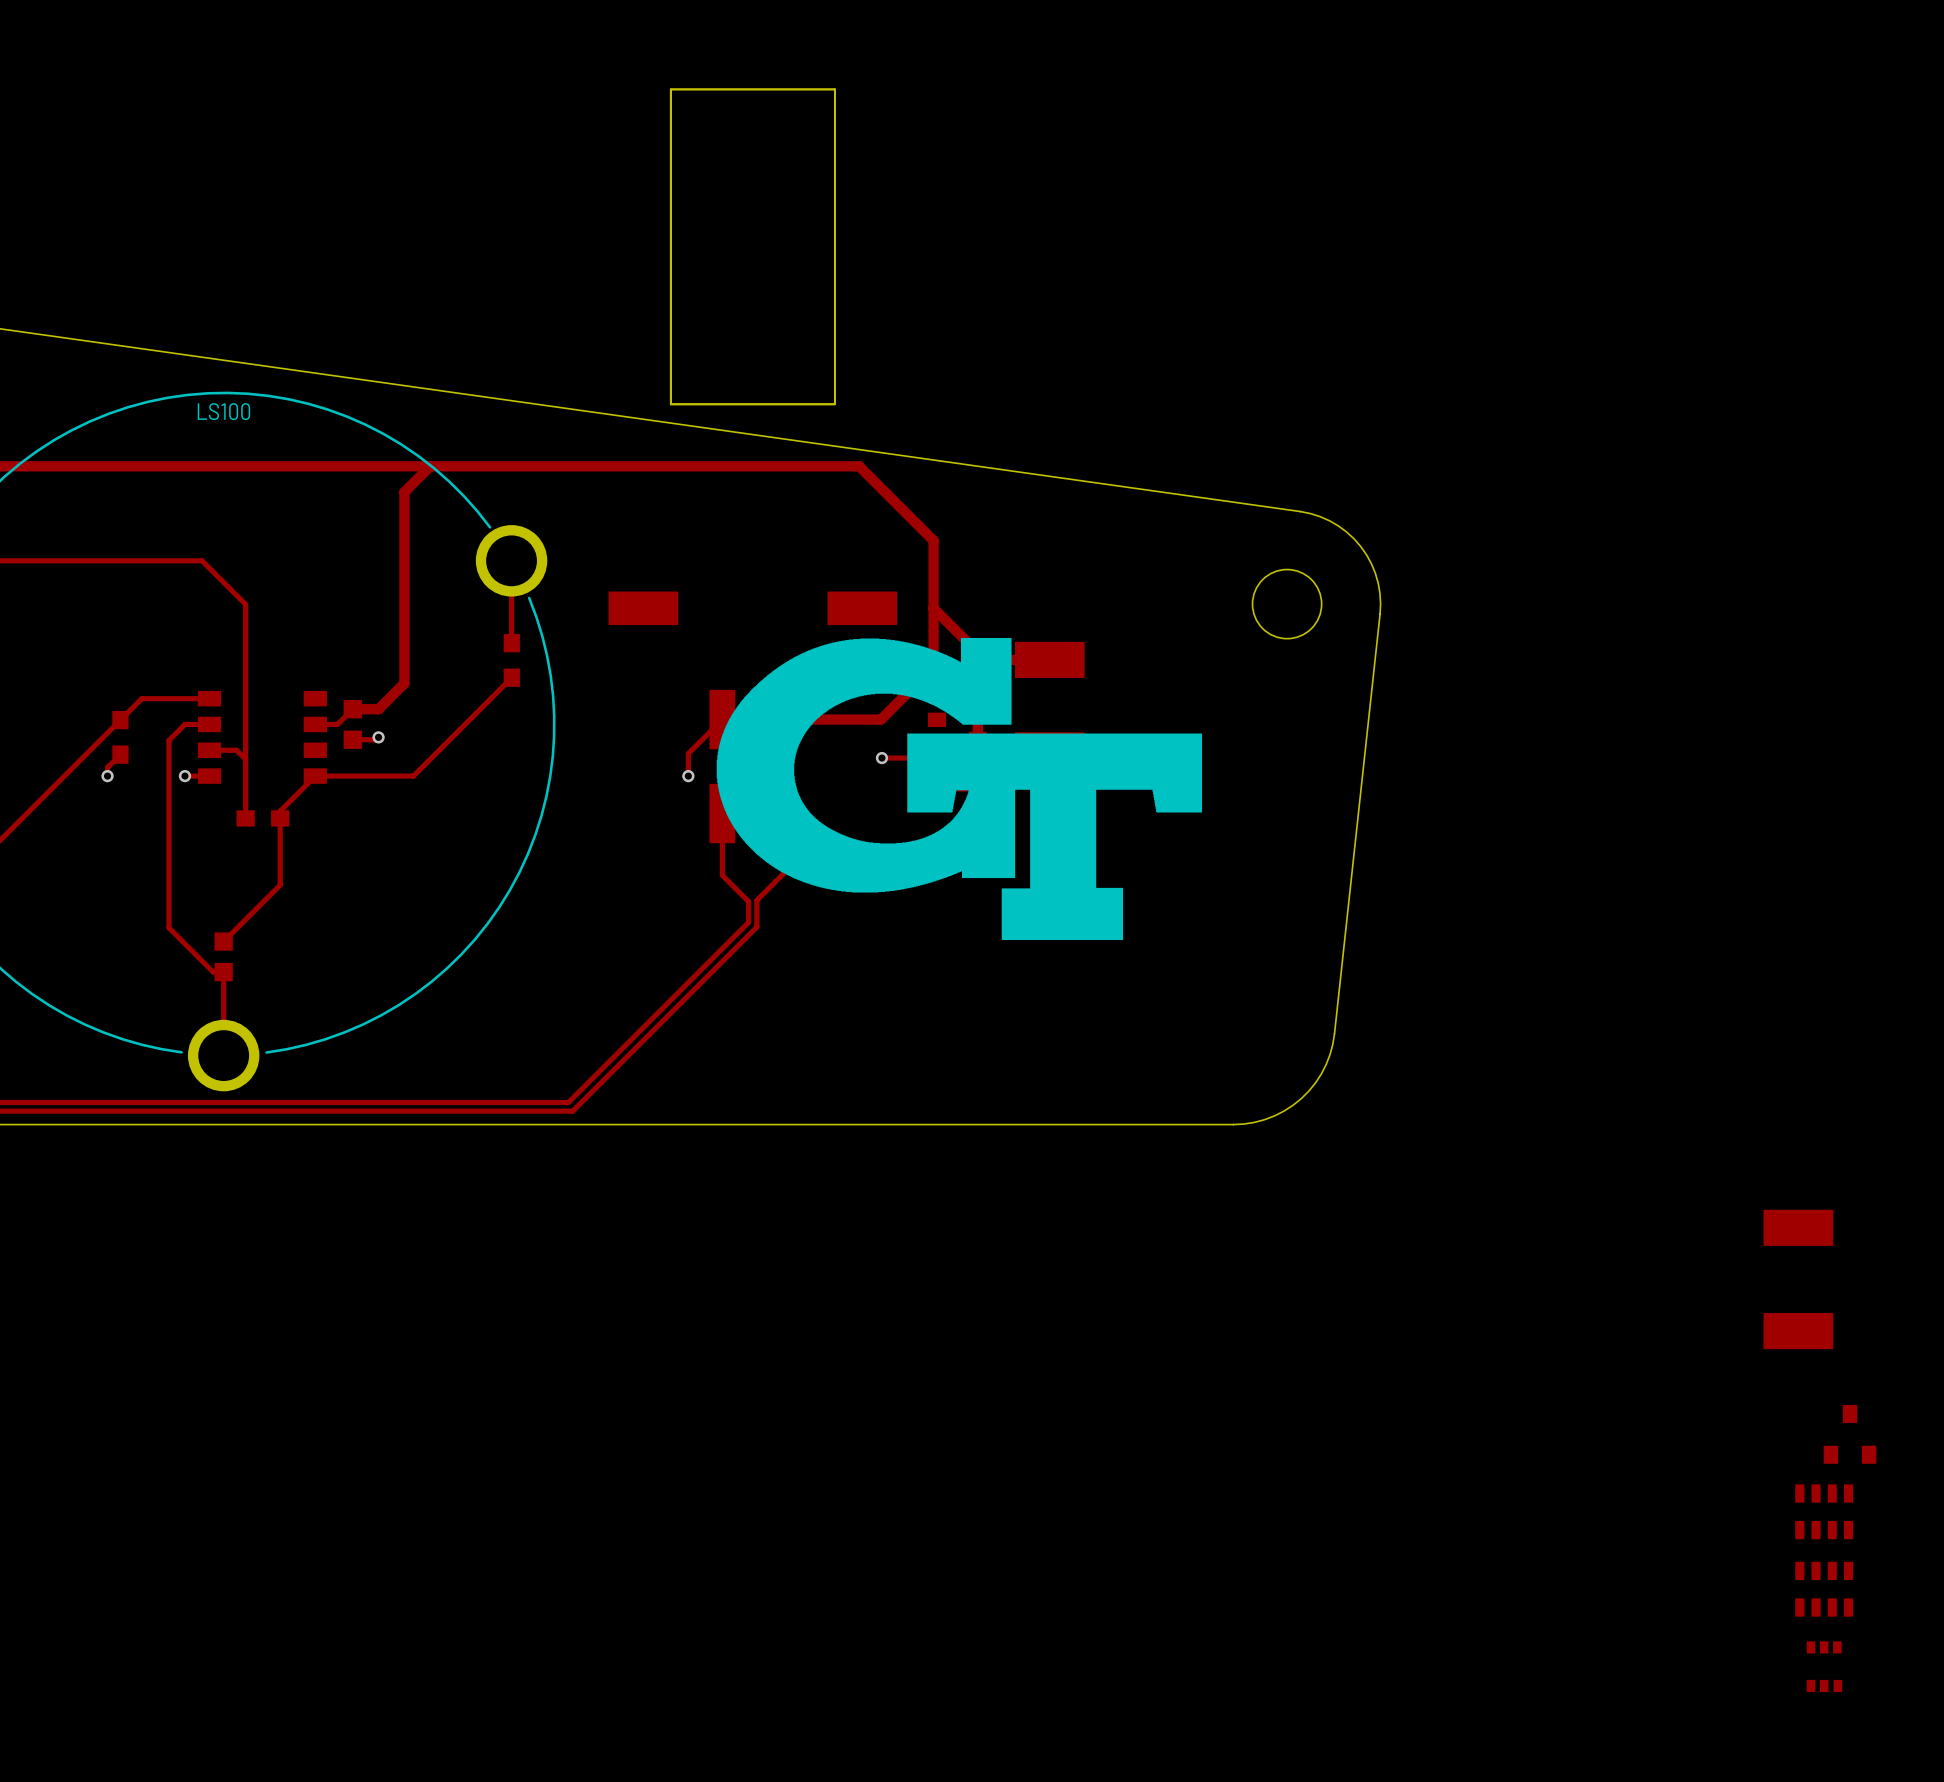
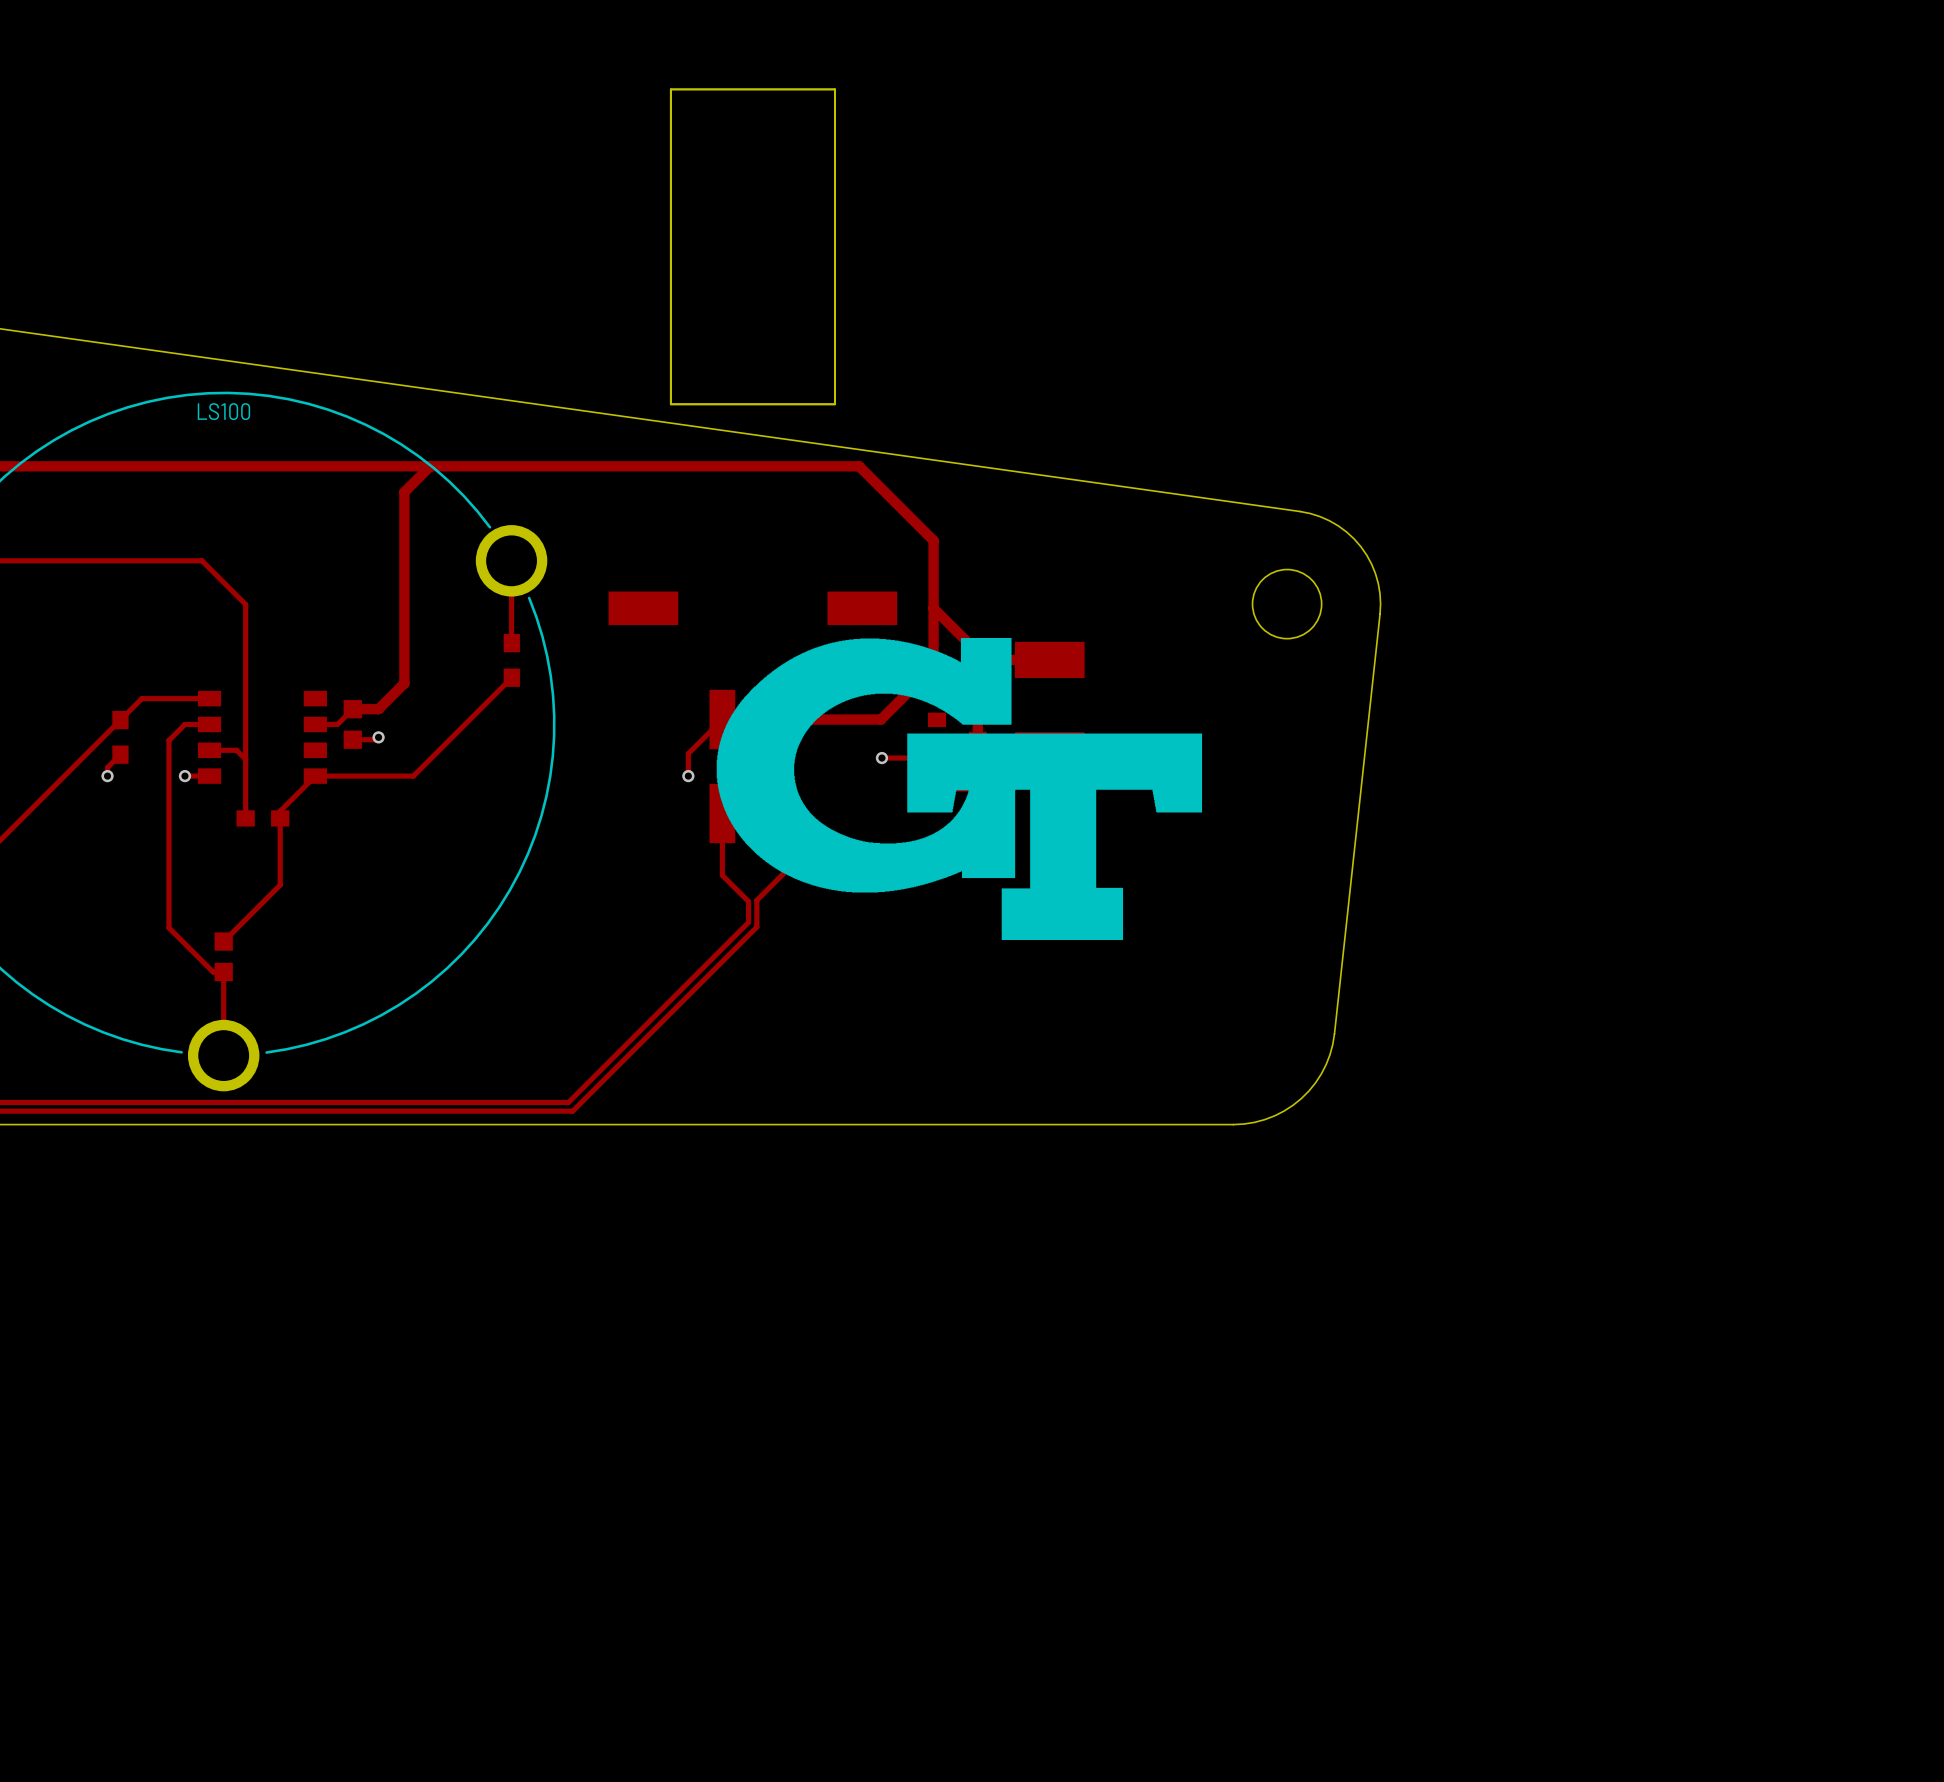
part: (1798, 1227) -> none
part: (1798, 1331) -> none
part: (1849, 1434) -> none
part: (1824, 1511) -> none
part: (1824, 1589) -> none
part: (1824, 1666) -> none

